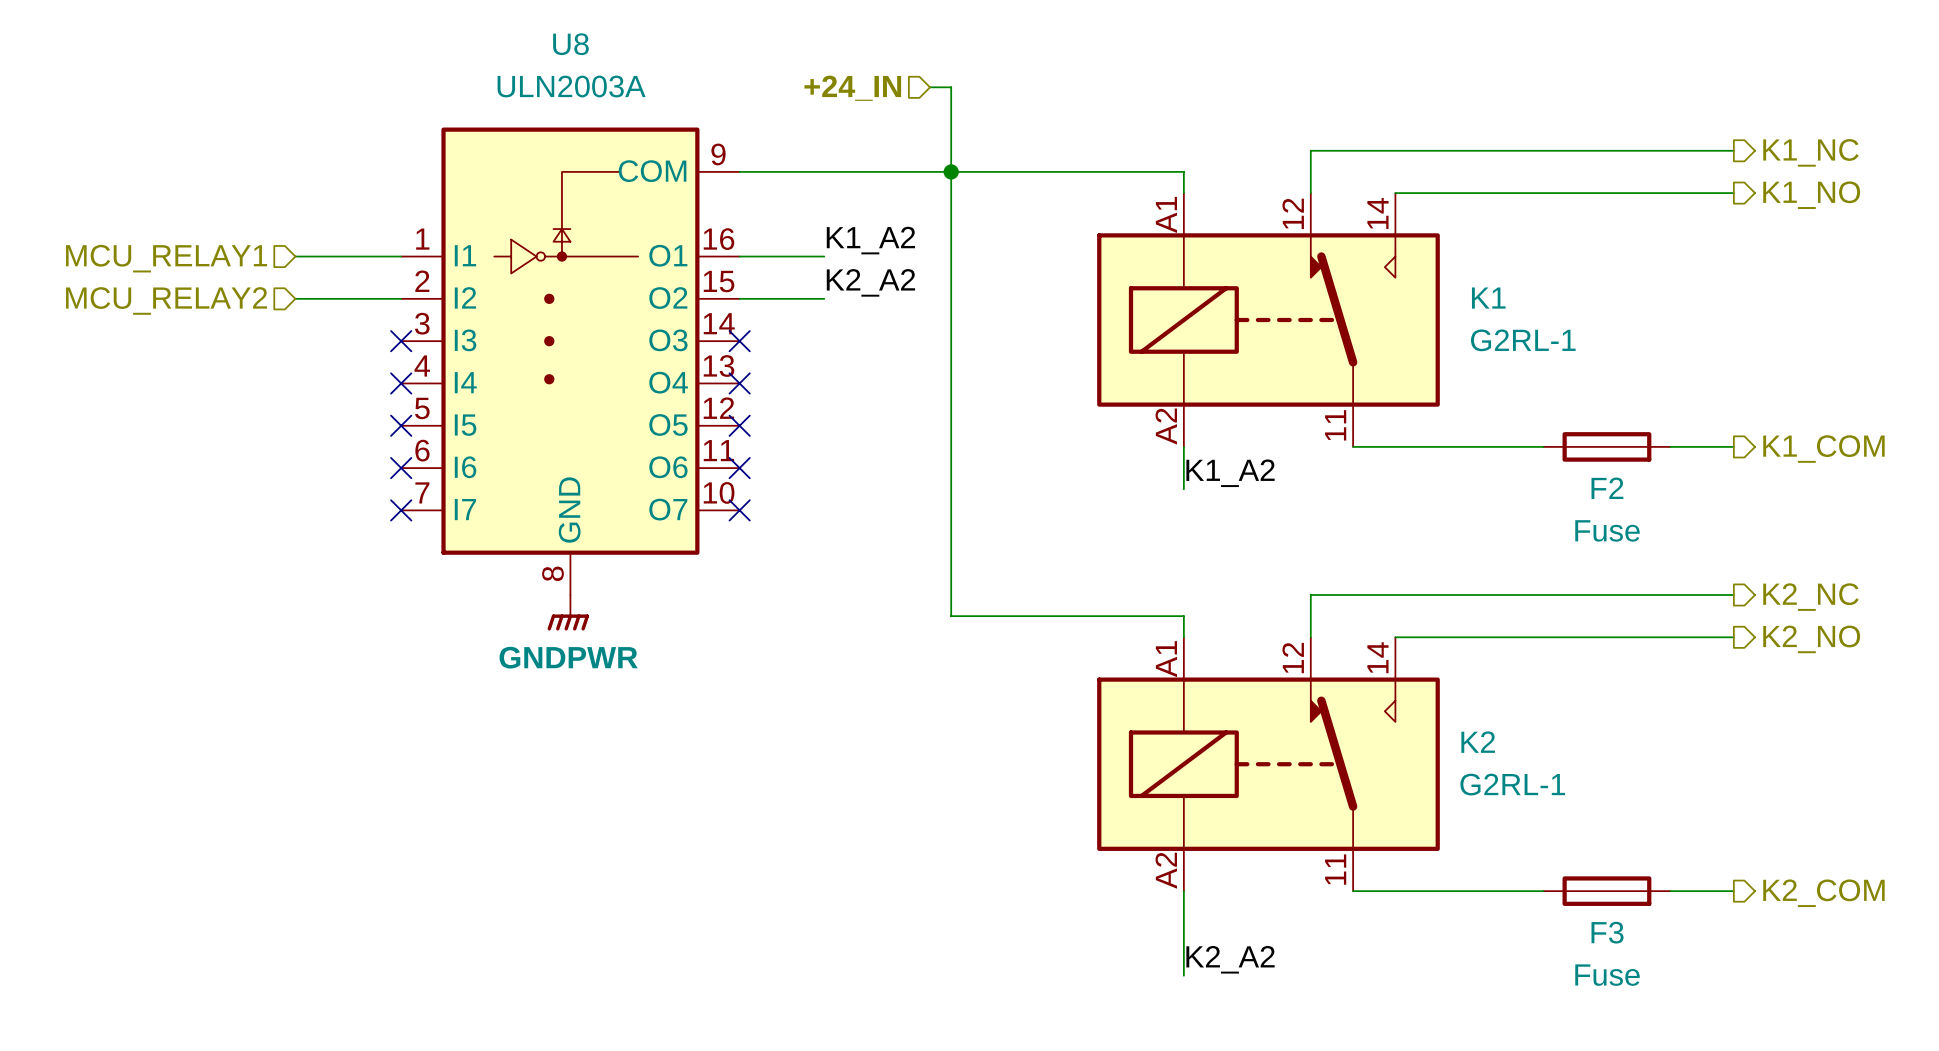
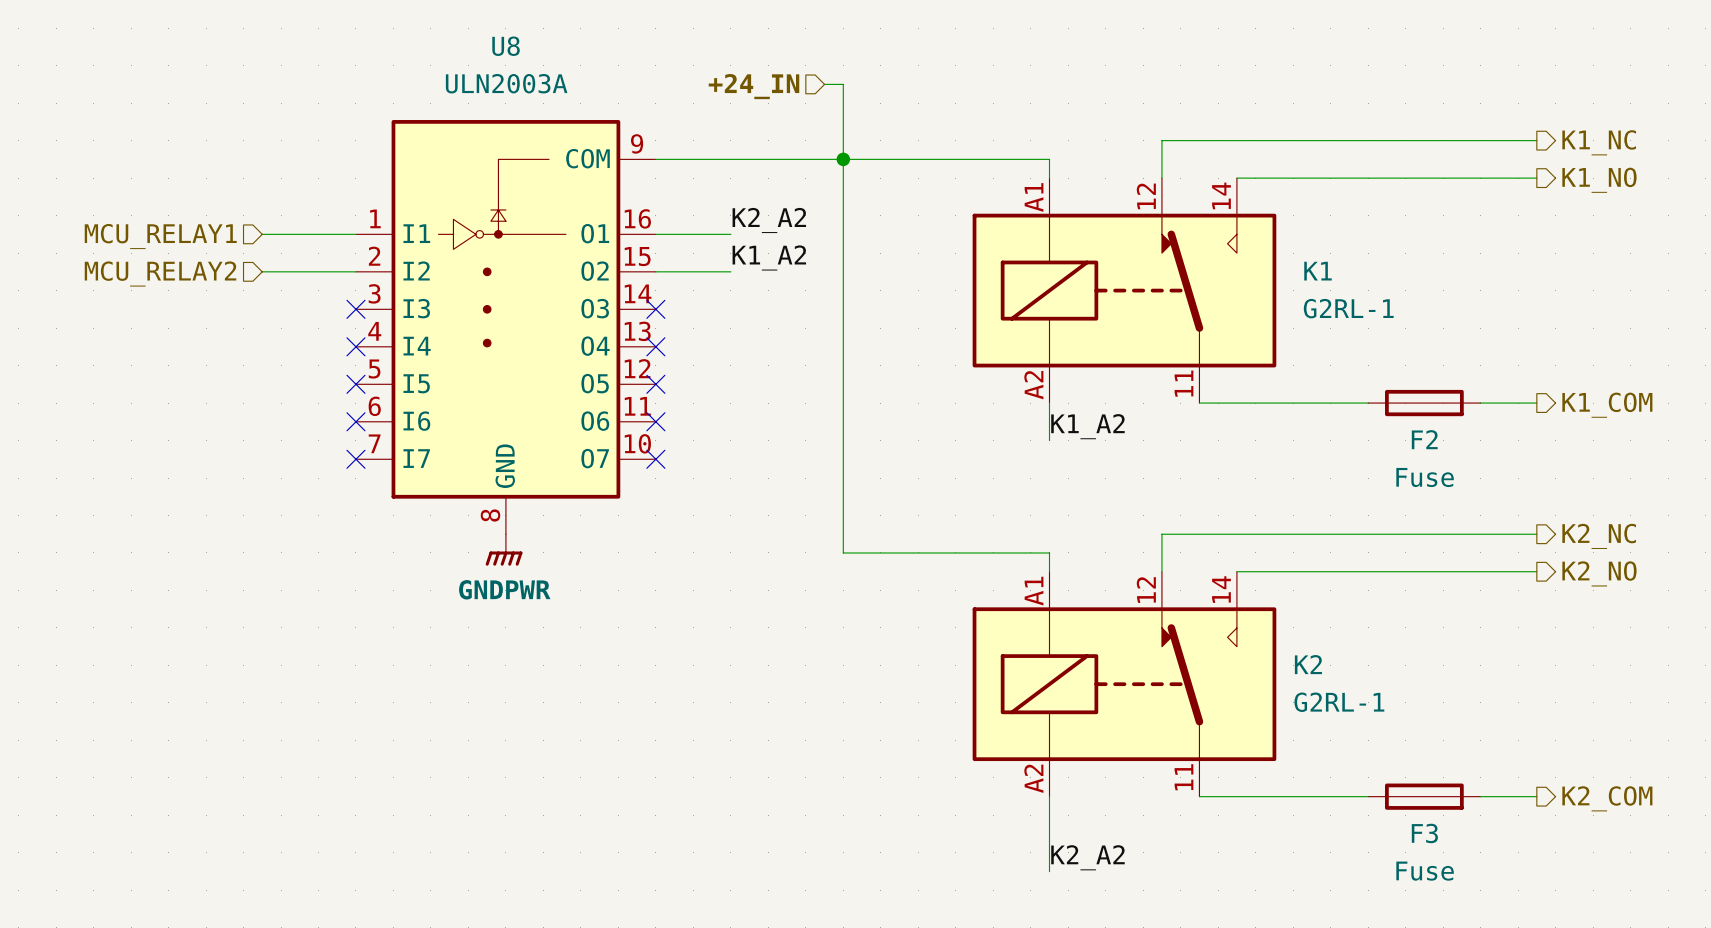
label: K1_A2 (870, 240) -> K2_A2 (769, 220)
label: K2_A2 (870, 282) -> K1_A2 (769, 257)

